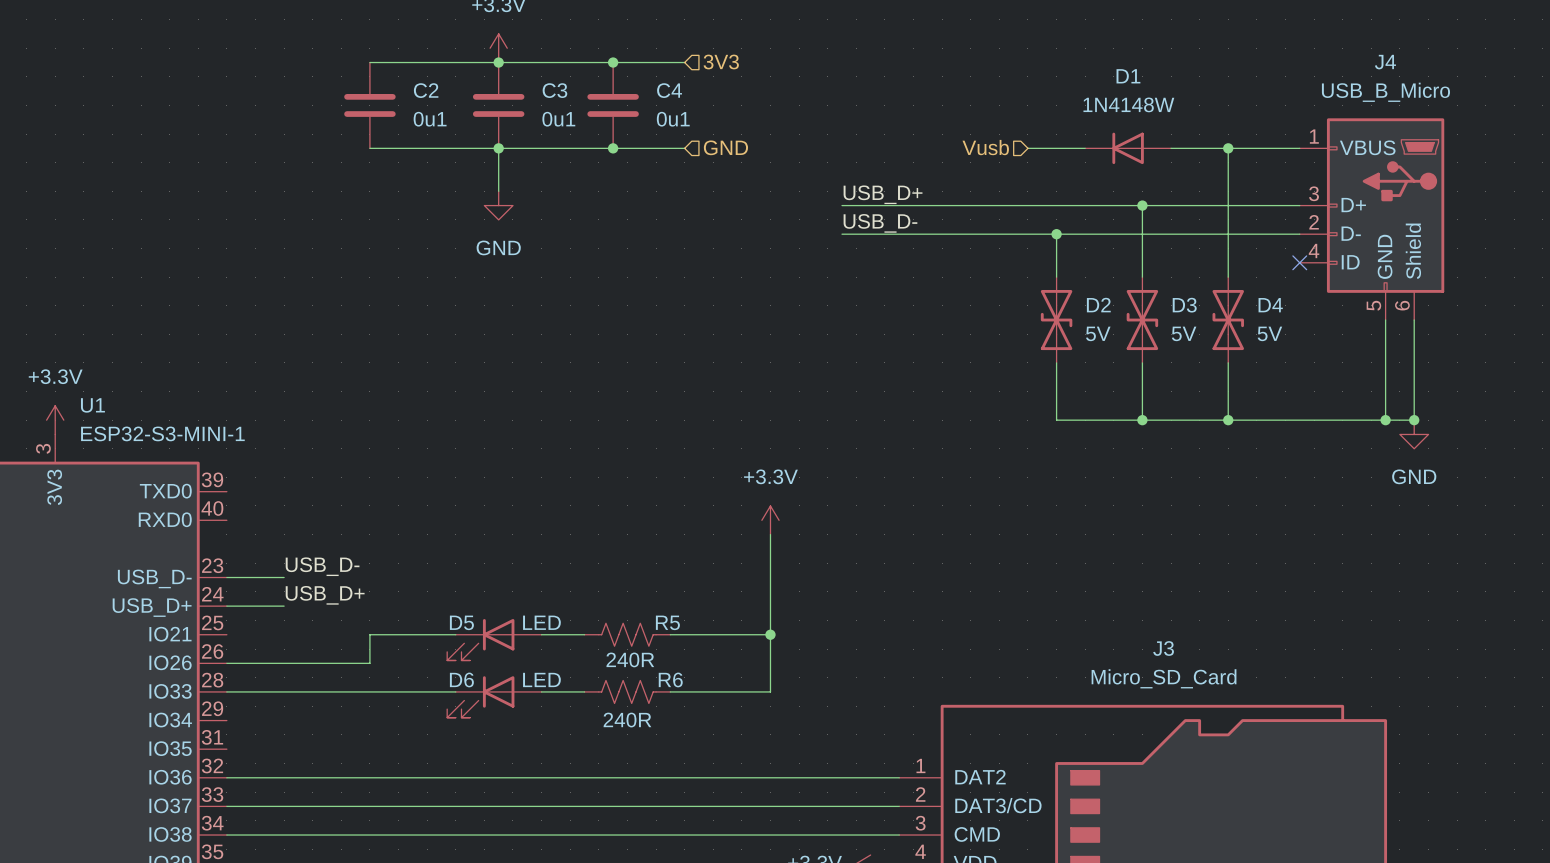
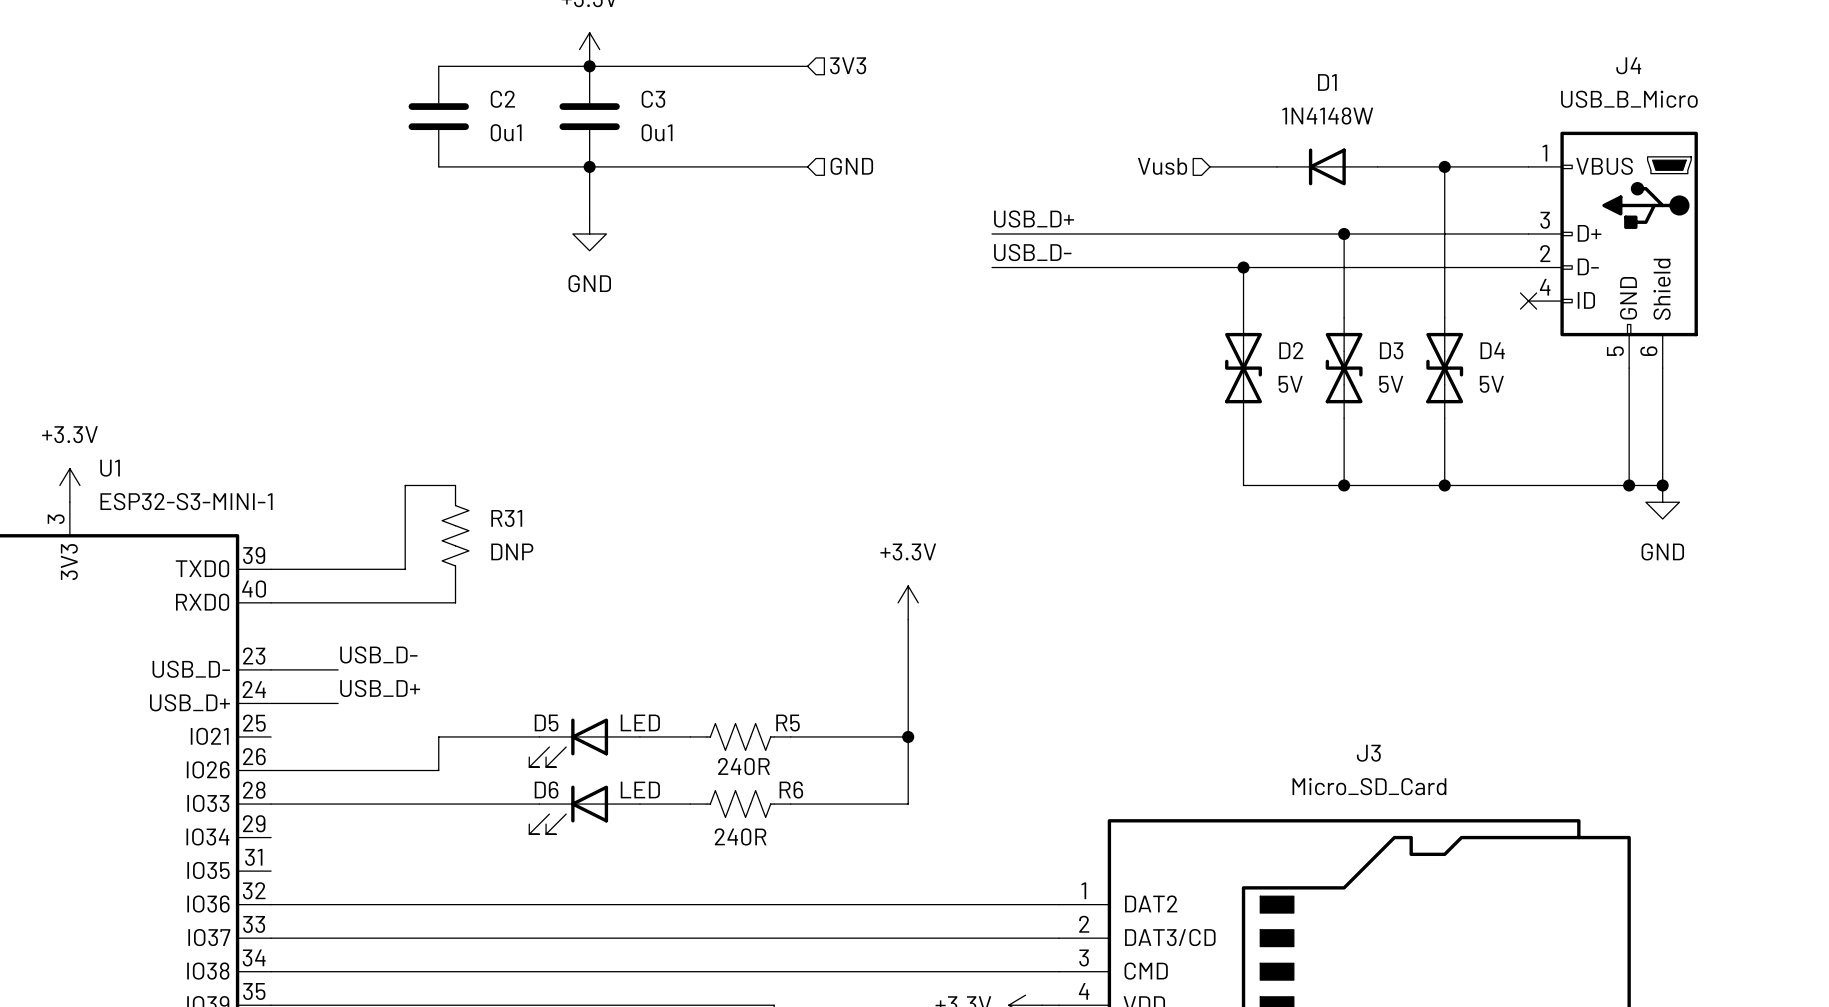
junction: (613, 62) -> none
C4: 0u1 (613, 105) -> none
junction: (613, 148) -> none
wire: none -> (455, 485) (405, 485) (405, 569) (271, 569)
R31: none -> DNP (455, 535)
wire: none -> (455, 586) (455, 602) (271, 602)

